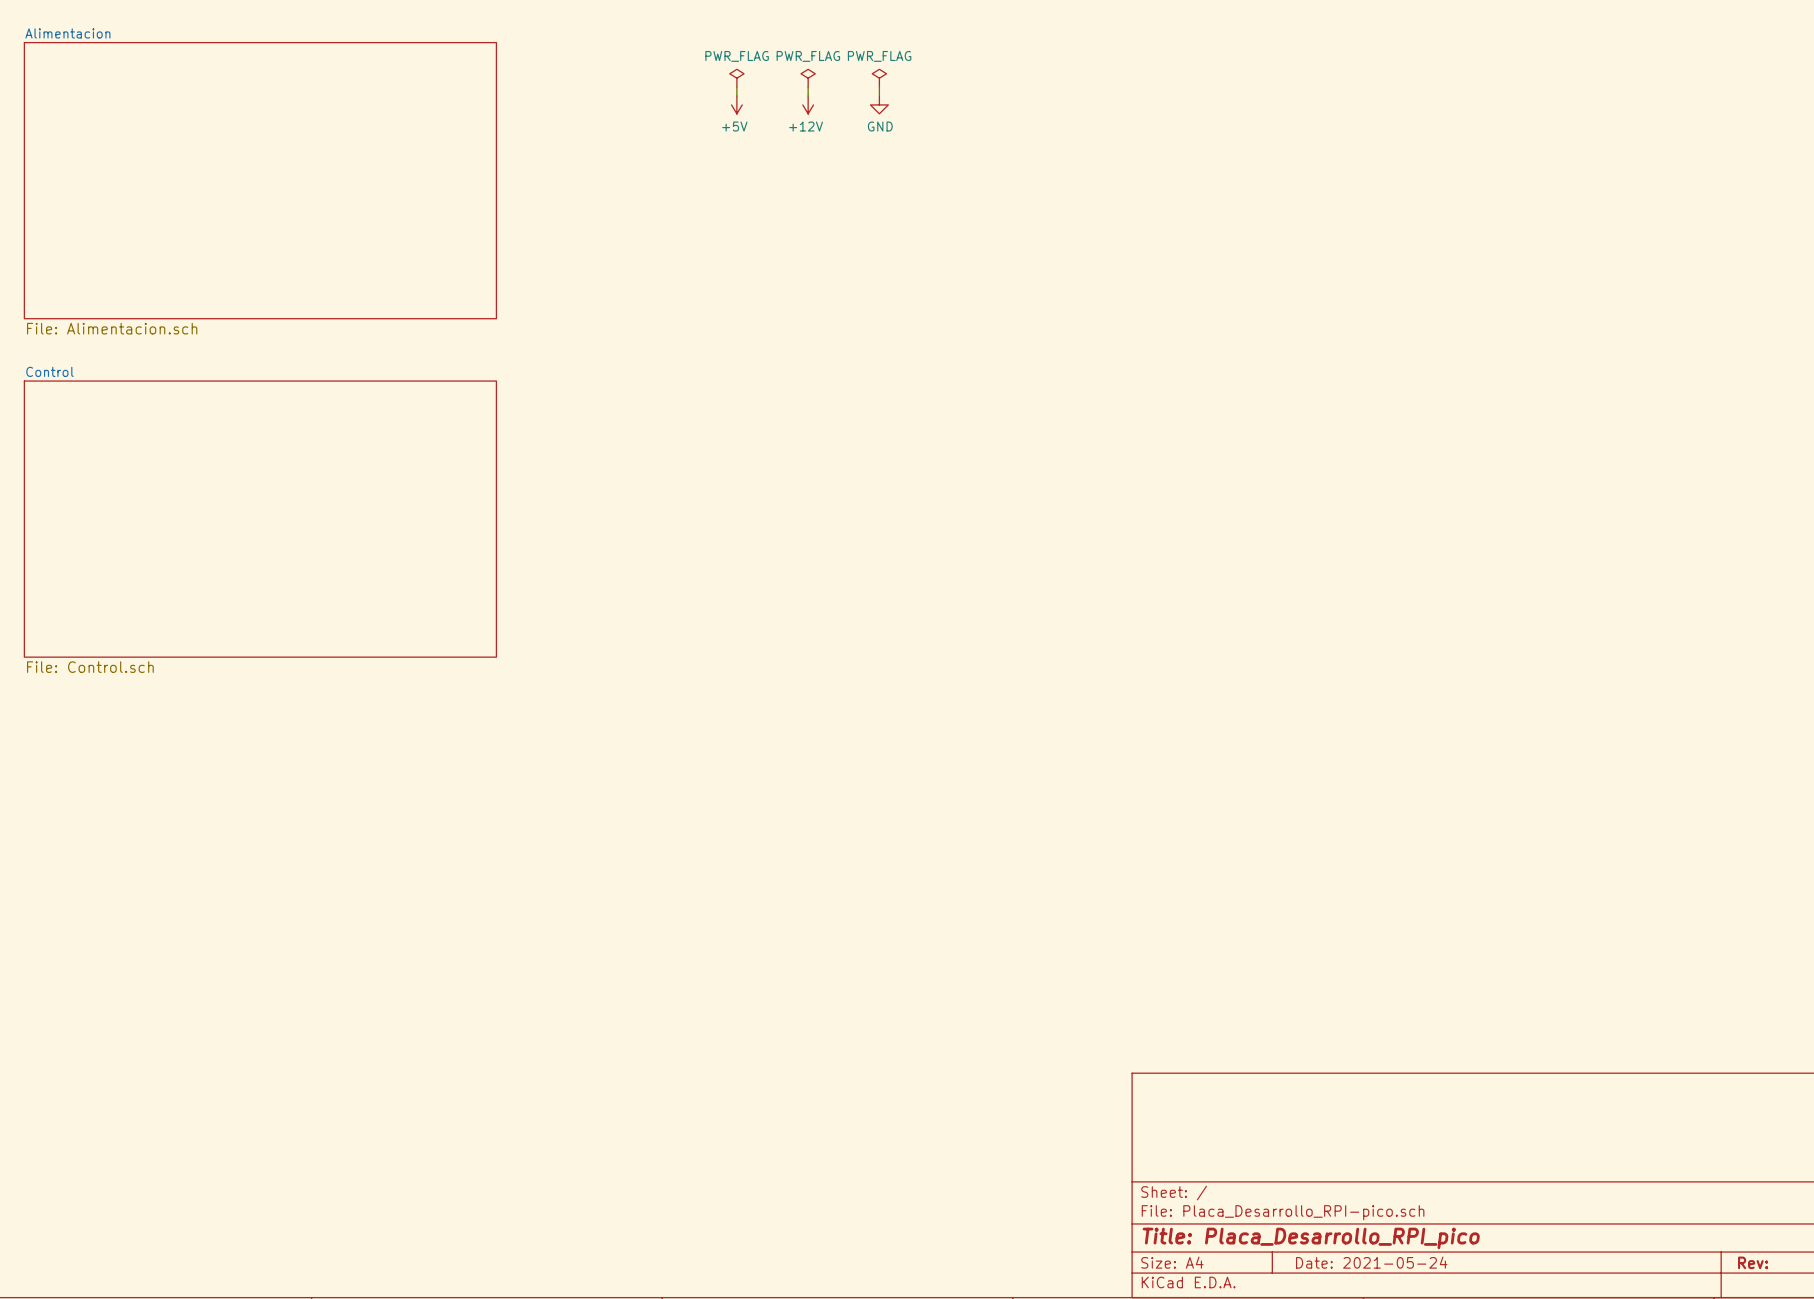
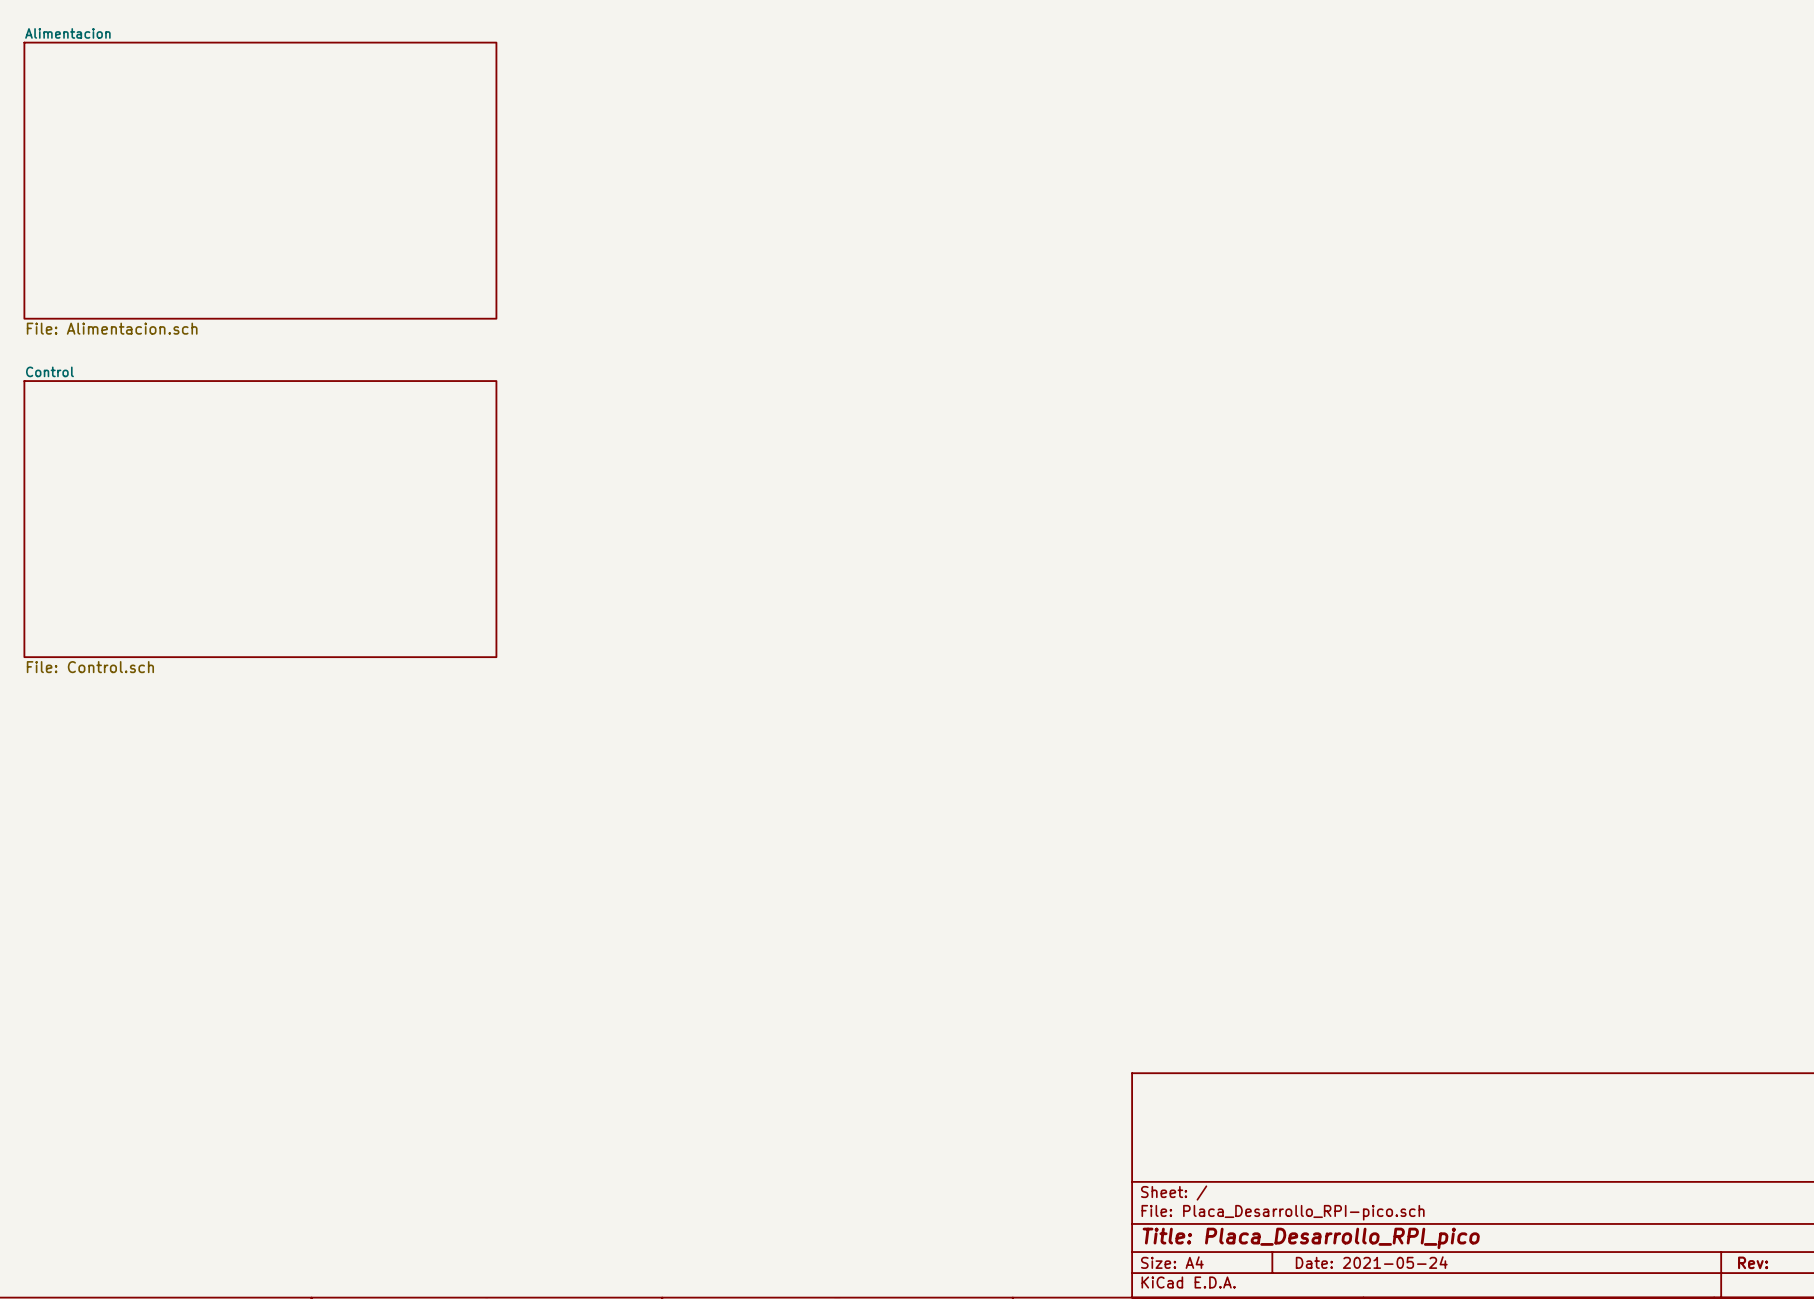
power symbol: PWR_FLAG (736, 78) -> none
power symbol: PWR_FLAG (808, 78) -> none
power symbol: PWR_FLAG (879, 78) -> none
wire: (736, 87) (736, 96) -> none
wire: (808, 87) (808, 96) -> none
wire: (879, 87) (879, 96) -> none
power symbol: +5V (736, 104) -> none
power symbol: +12V (808, 104) -> none
power symbol: GND (879, 104) -> none

